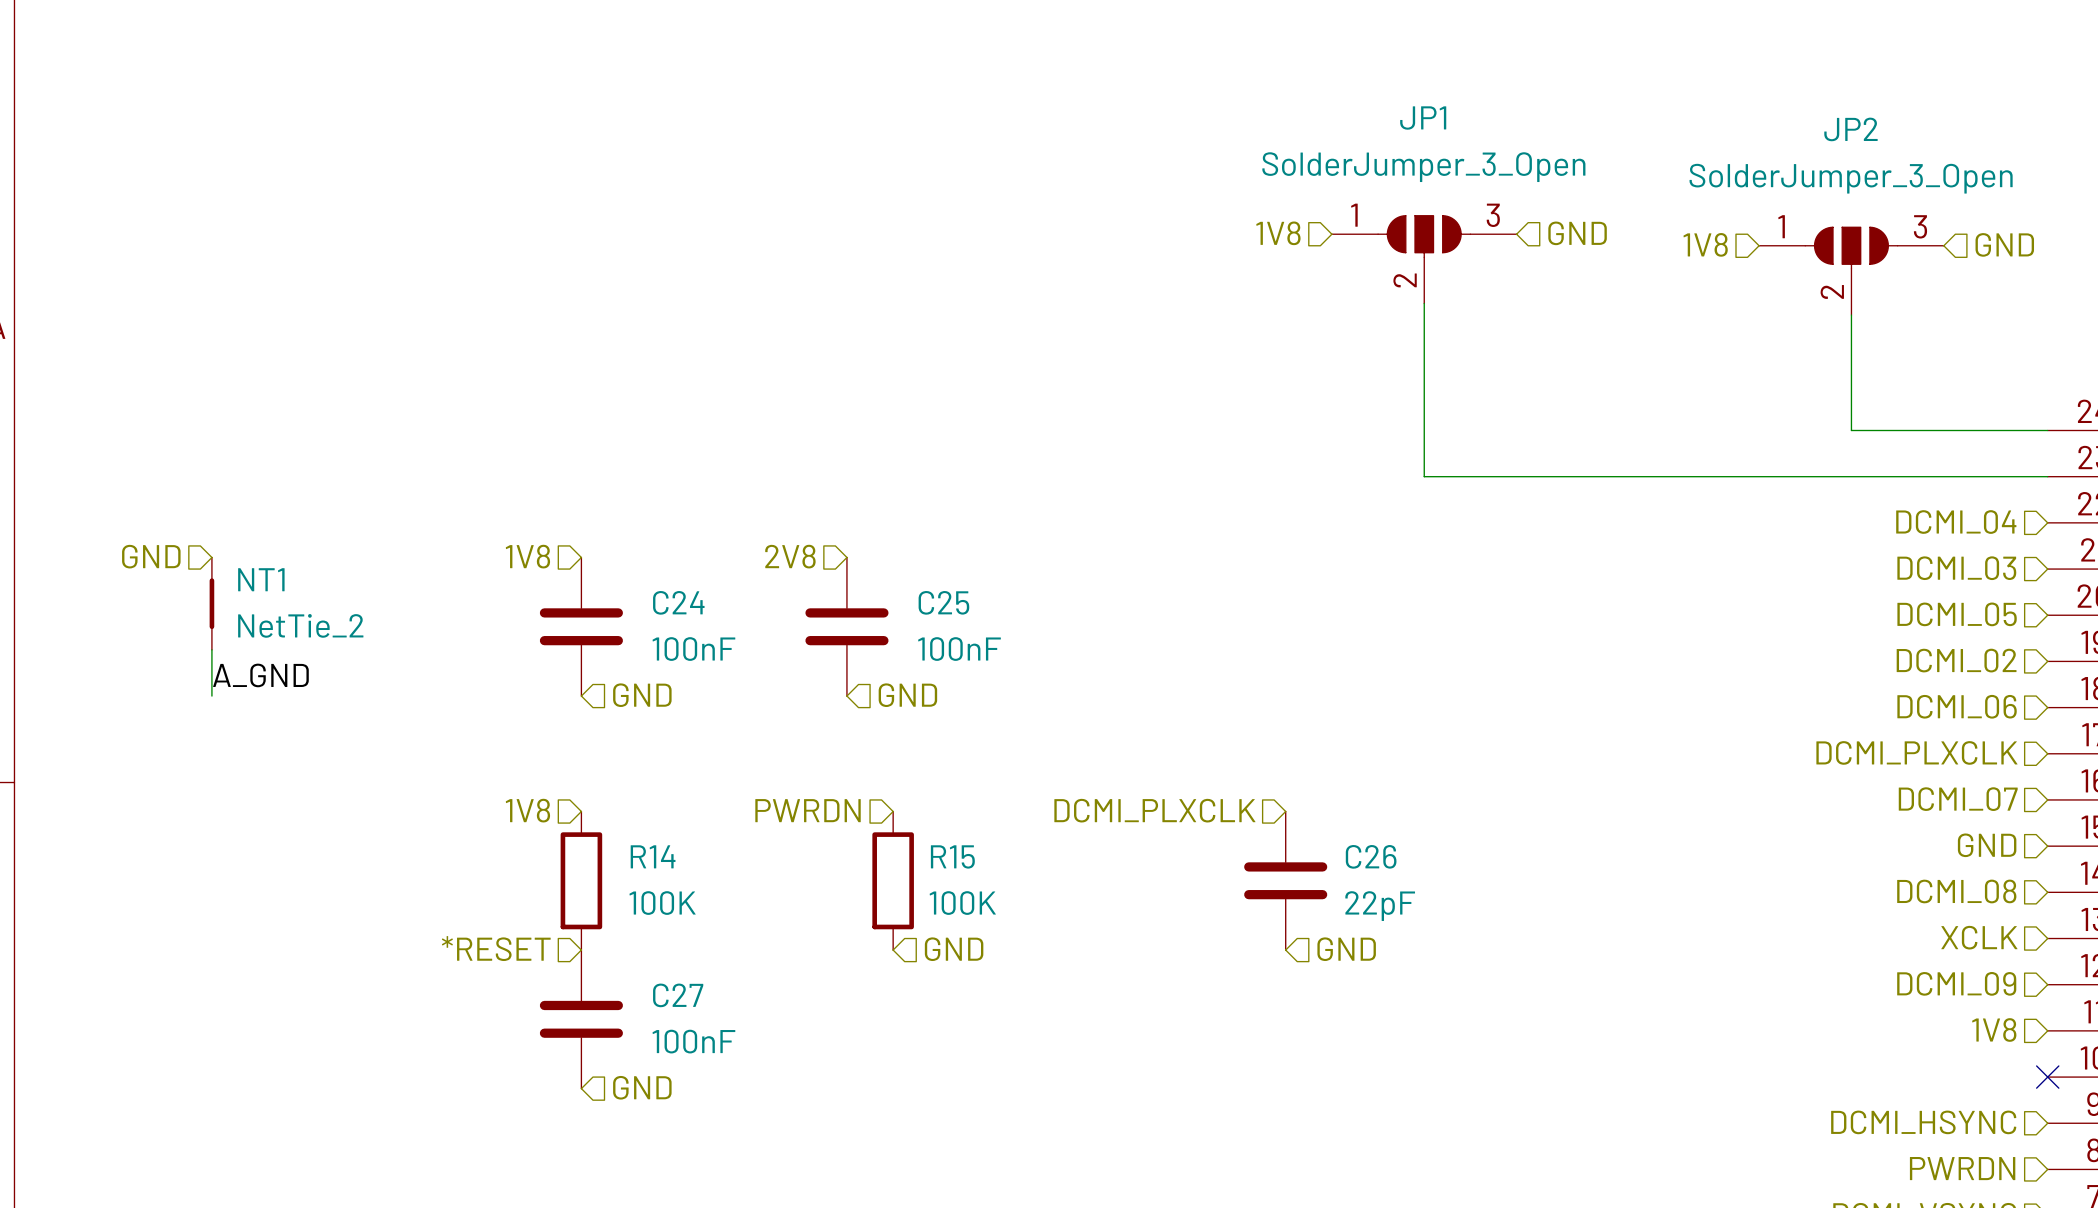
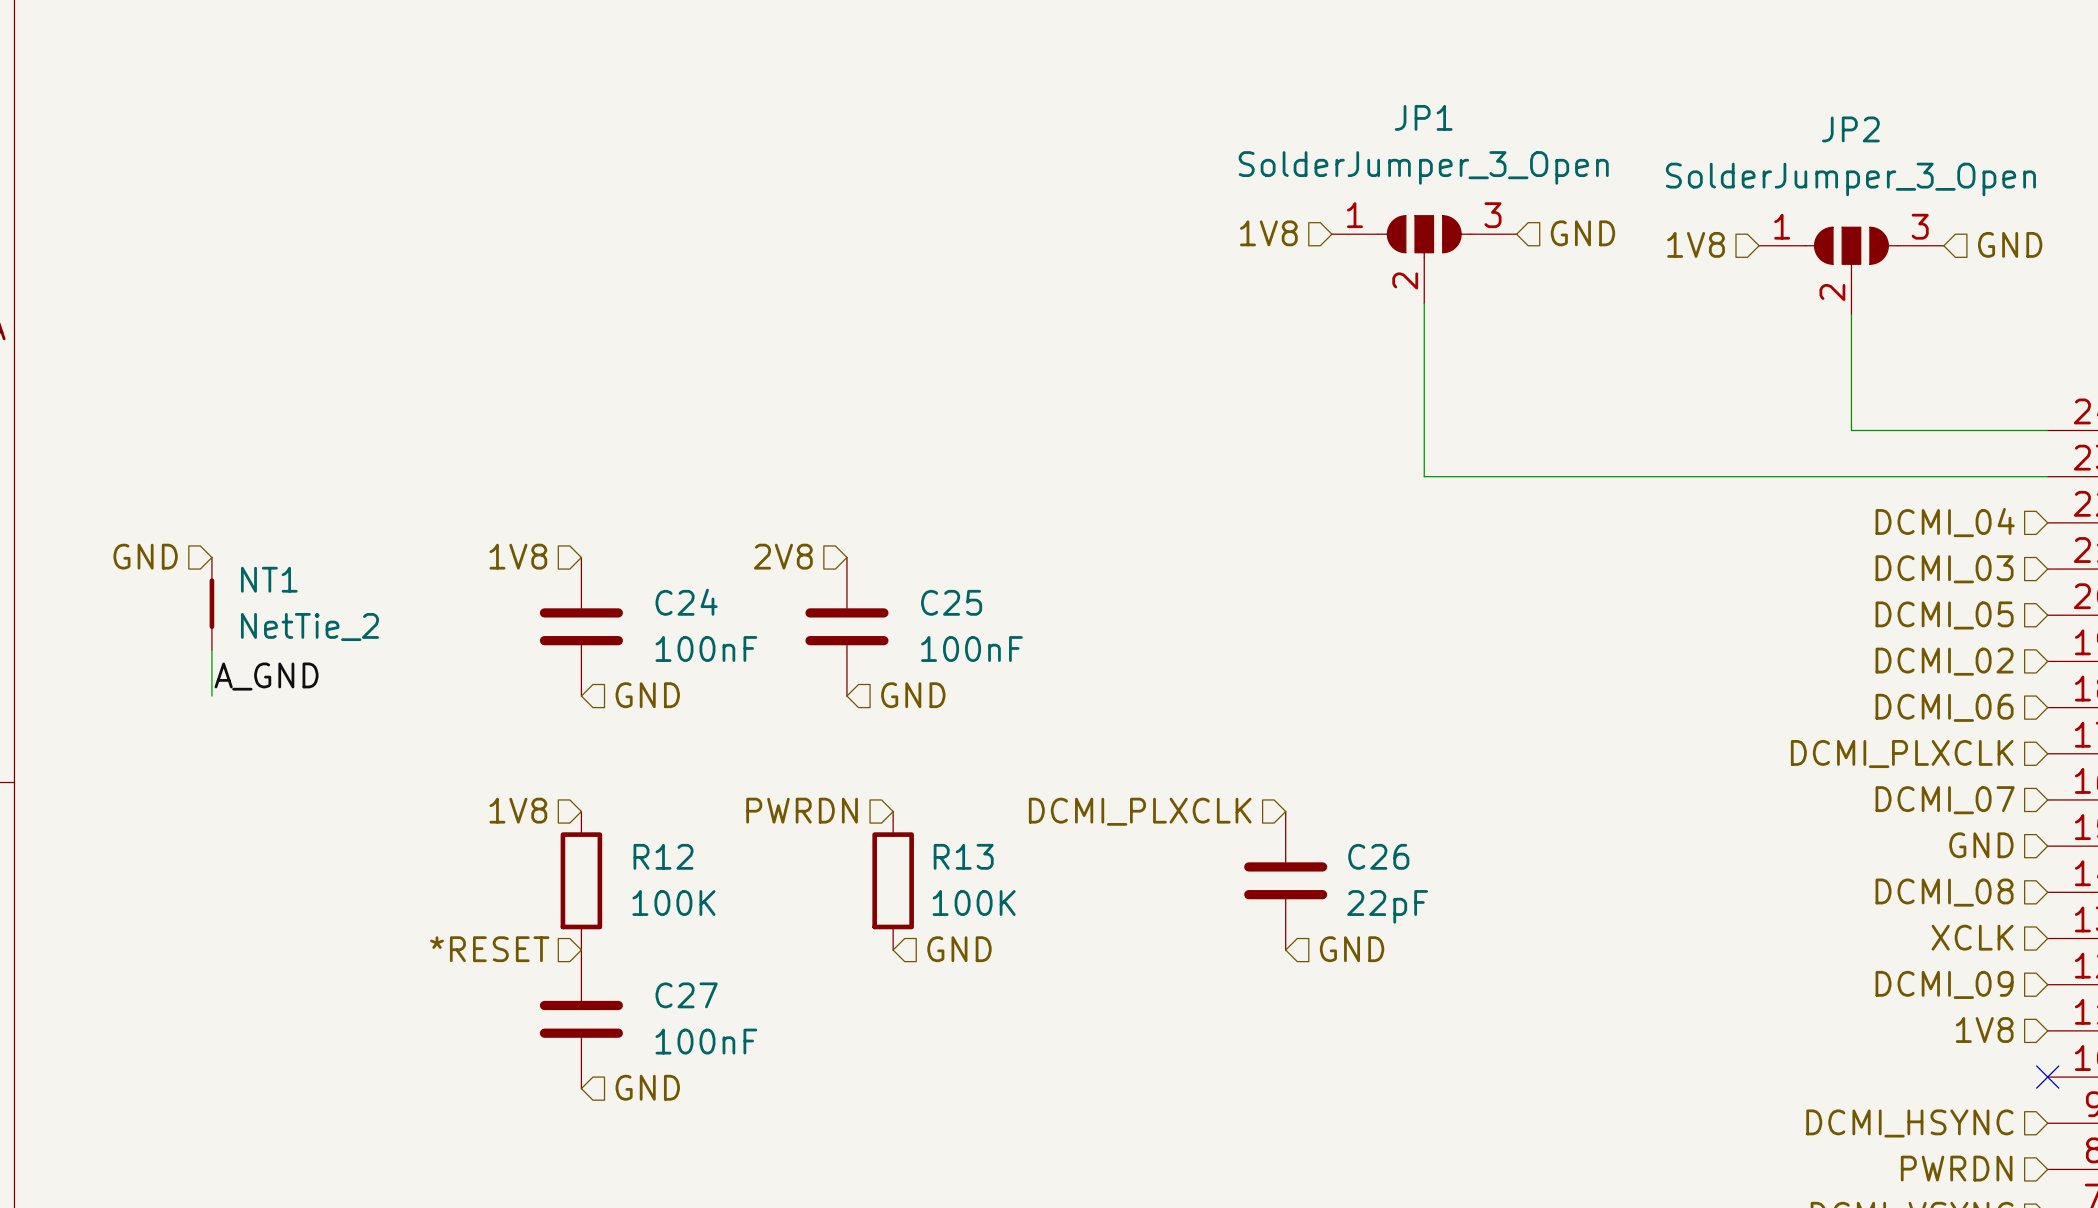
R14 name: R14 (653, 856) -> R12 (663, 856)
R15 name: R15 (952, 856) -> R13 (963, 856)

